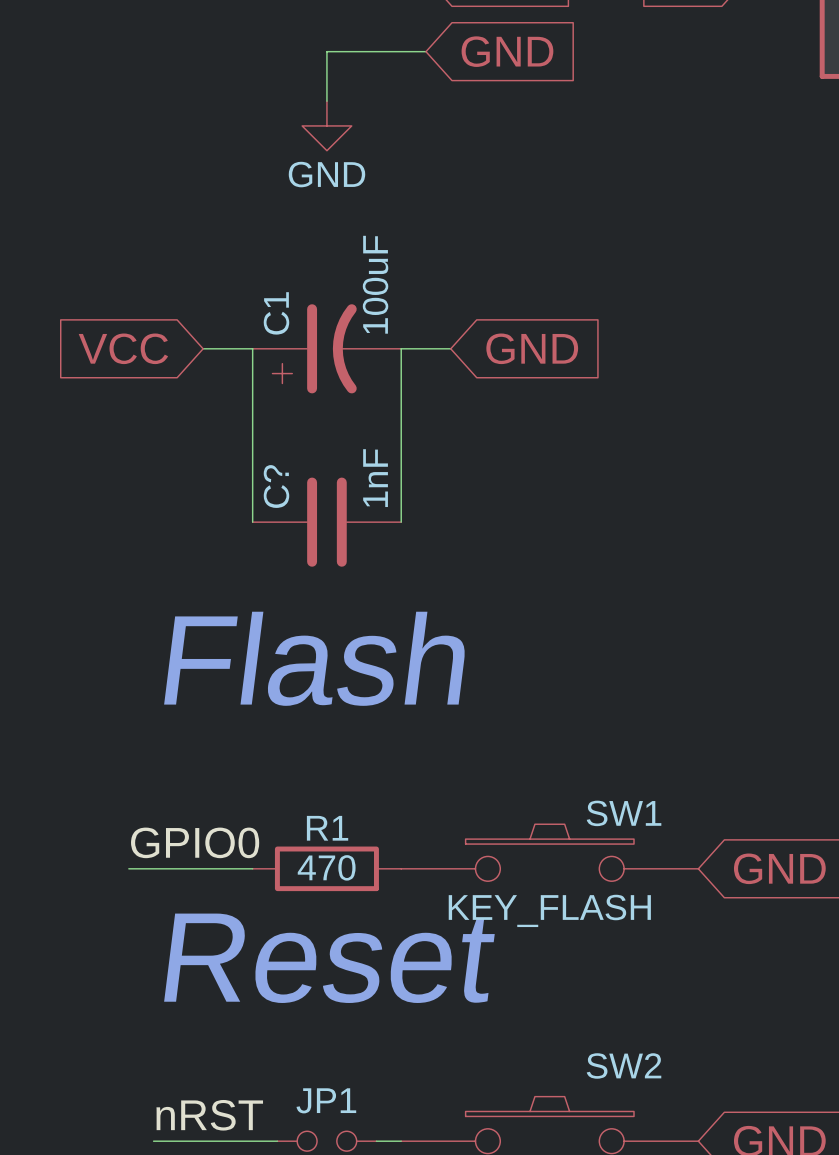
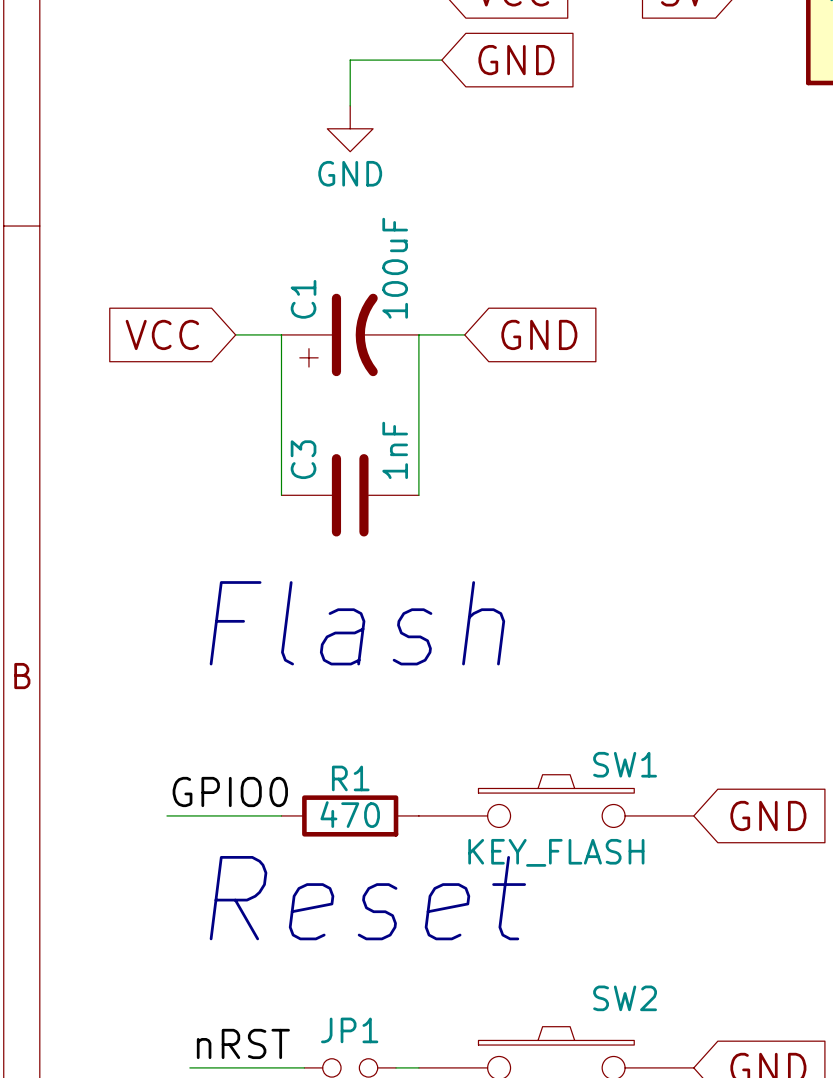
C? name: C? (276, 486) -> C3 (303, 459)

